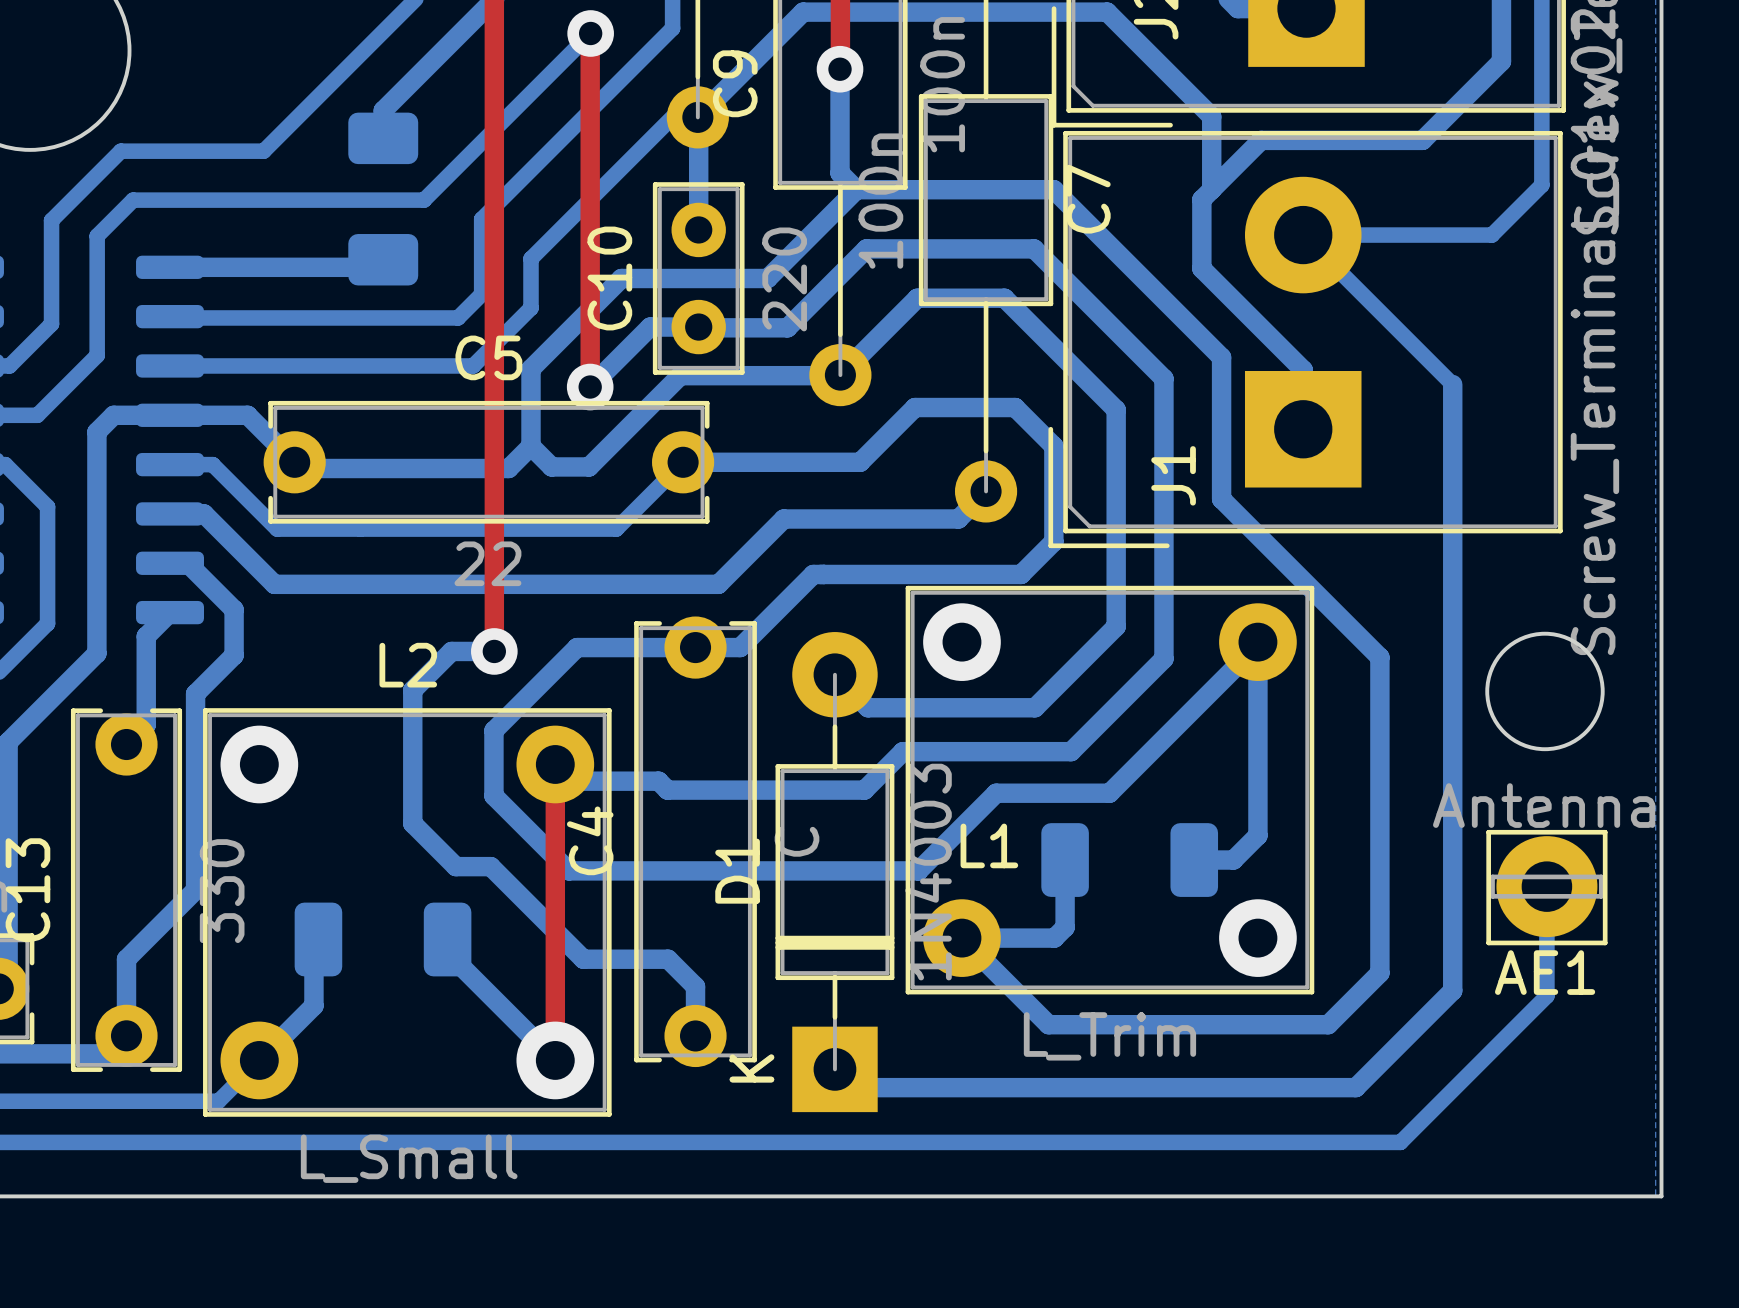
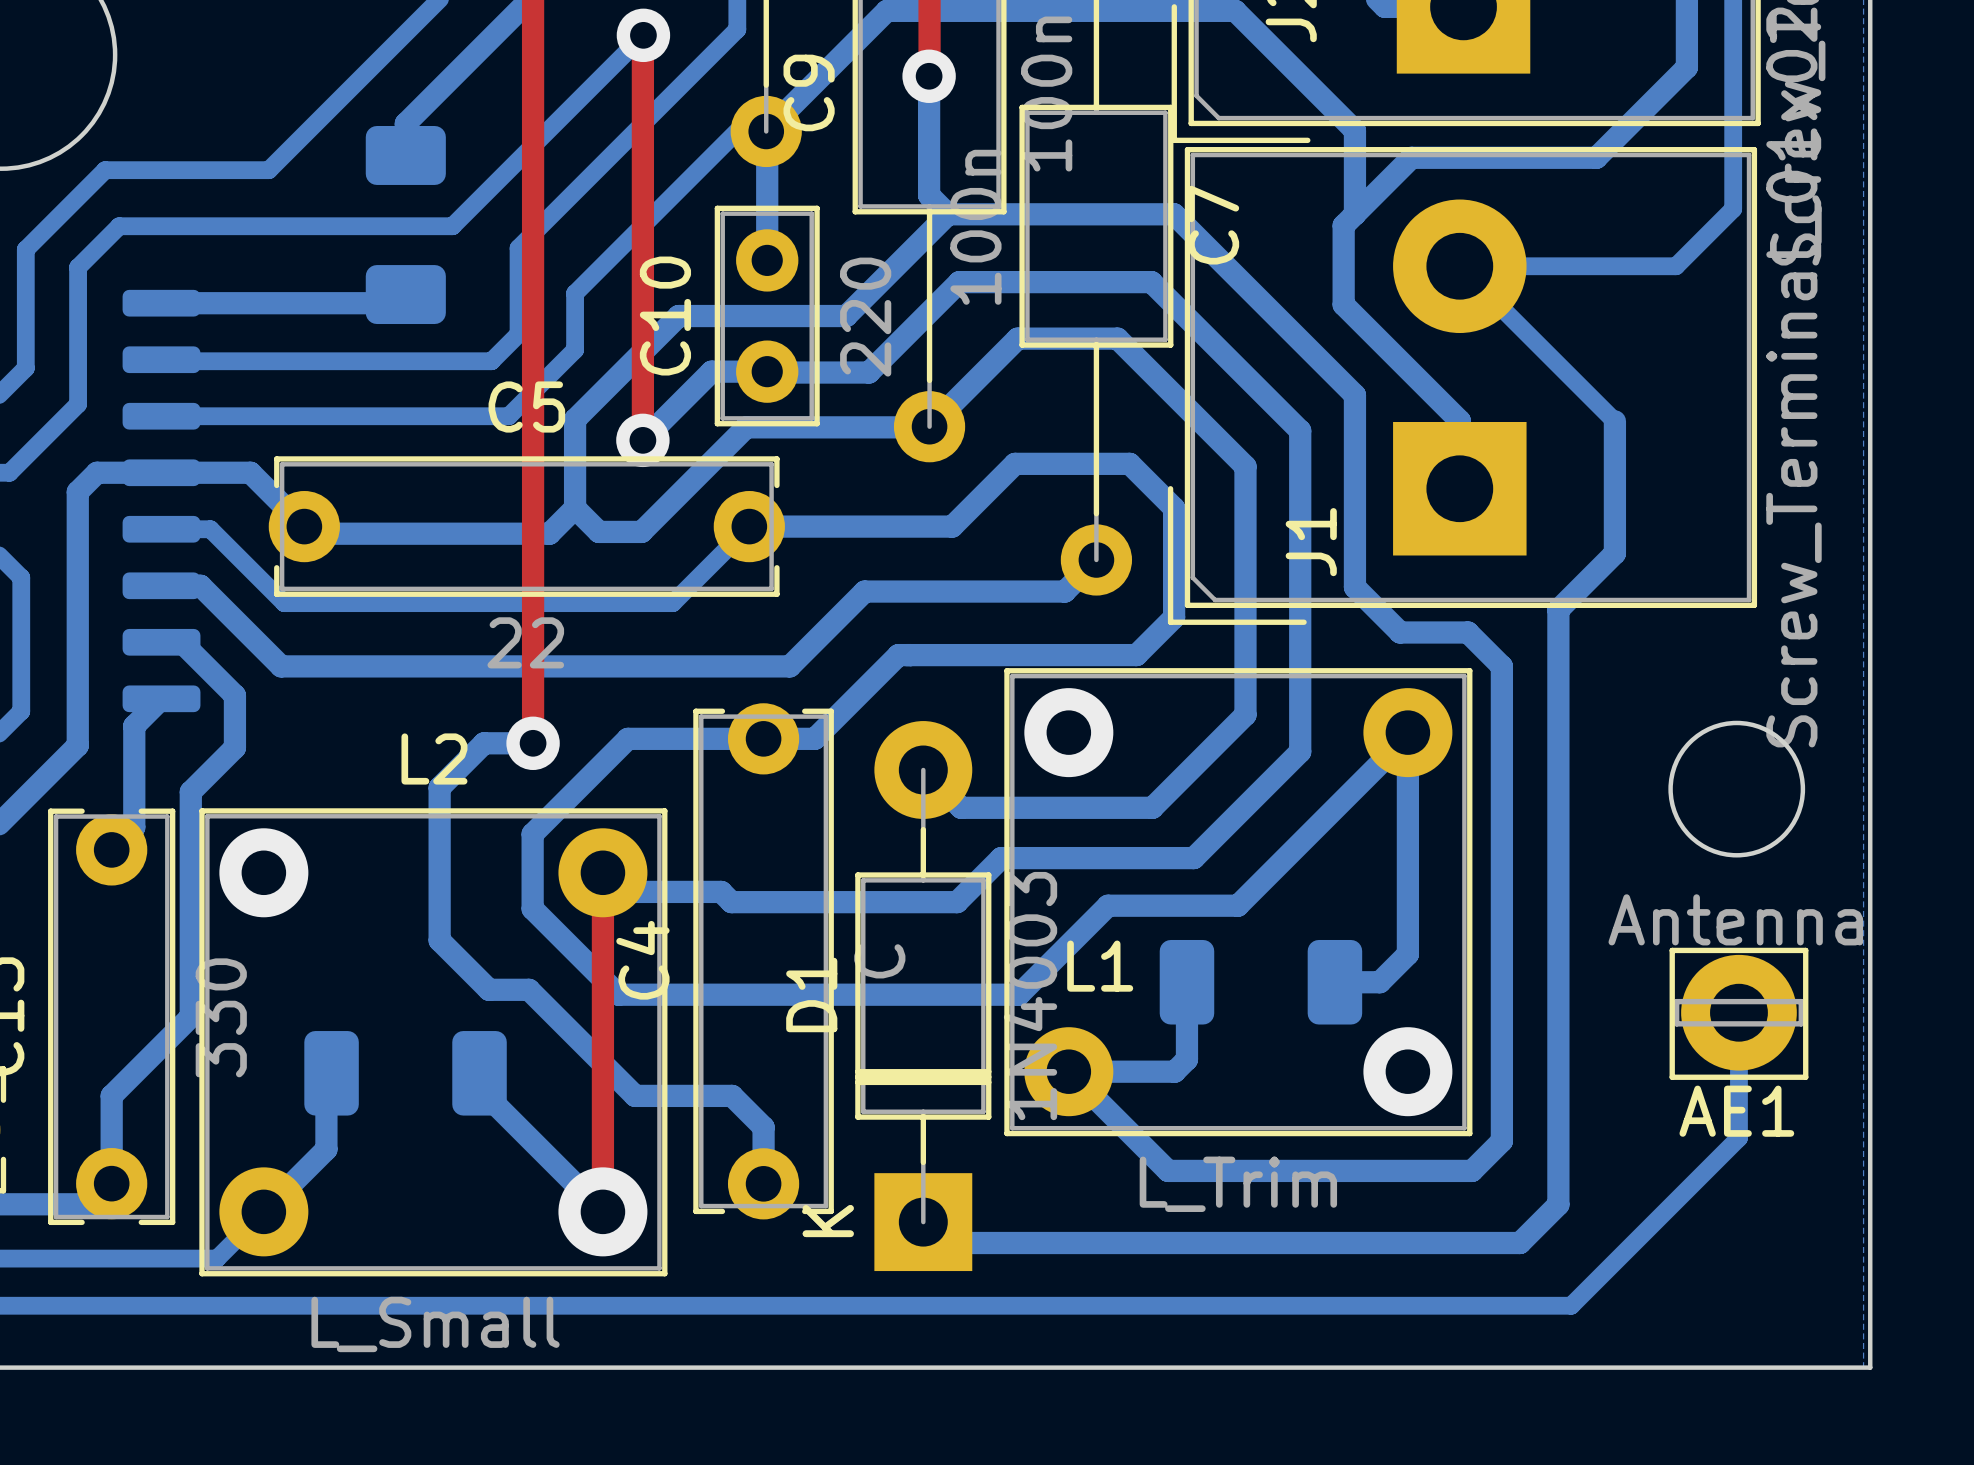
bottom track: (1211, 347) (1221, 357) (1221, 499) (1379, 657) (1379, 973) (1328, 1024) (1313, 1024) -> (1354, 395) (1354, 587) (1400, 632) (1467, 632) (1501, 666) (1501, 1141) (1472, 1170)
bottom track: (1438, 370) (1452, 384) (1452, 990) (1389, 1054) -> (1614, 421) (1614, 553) (1558, 609) (1558, 1204)

